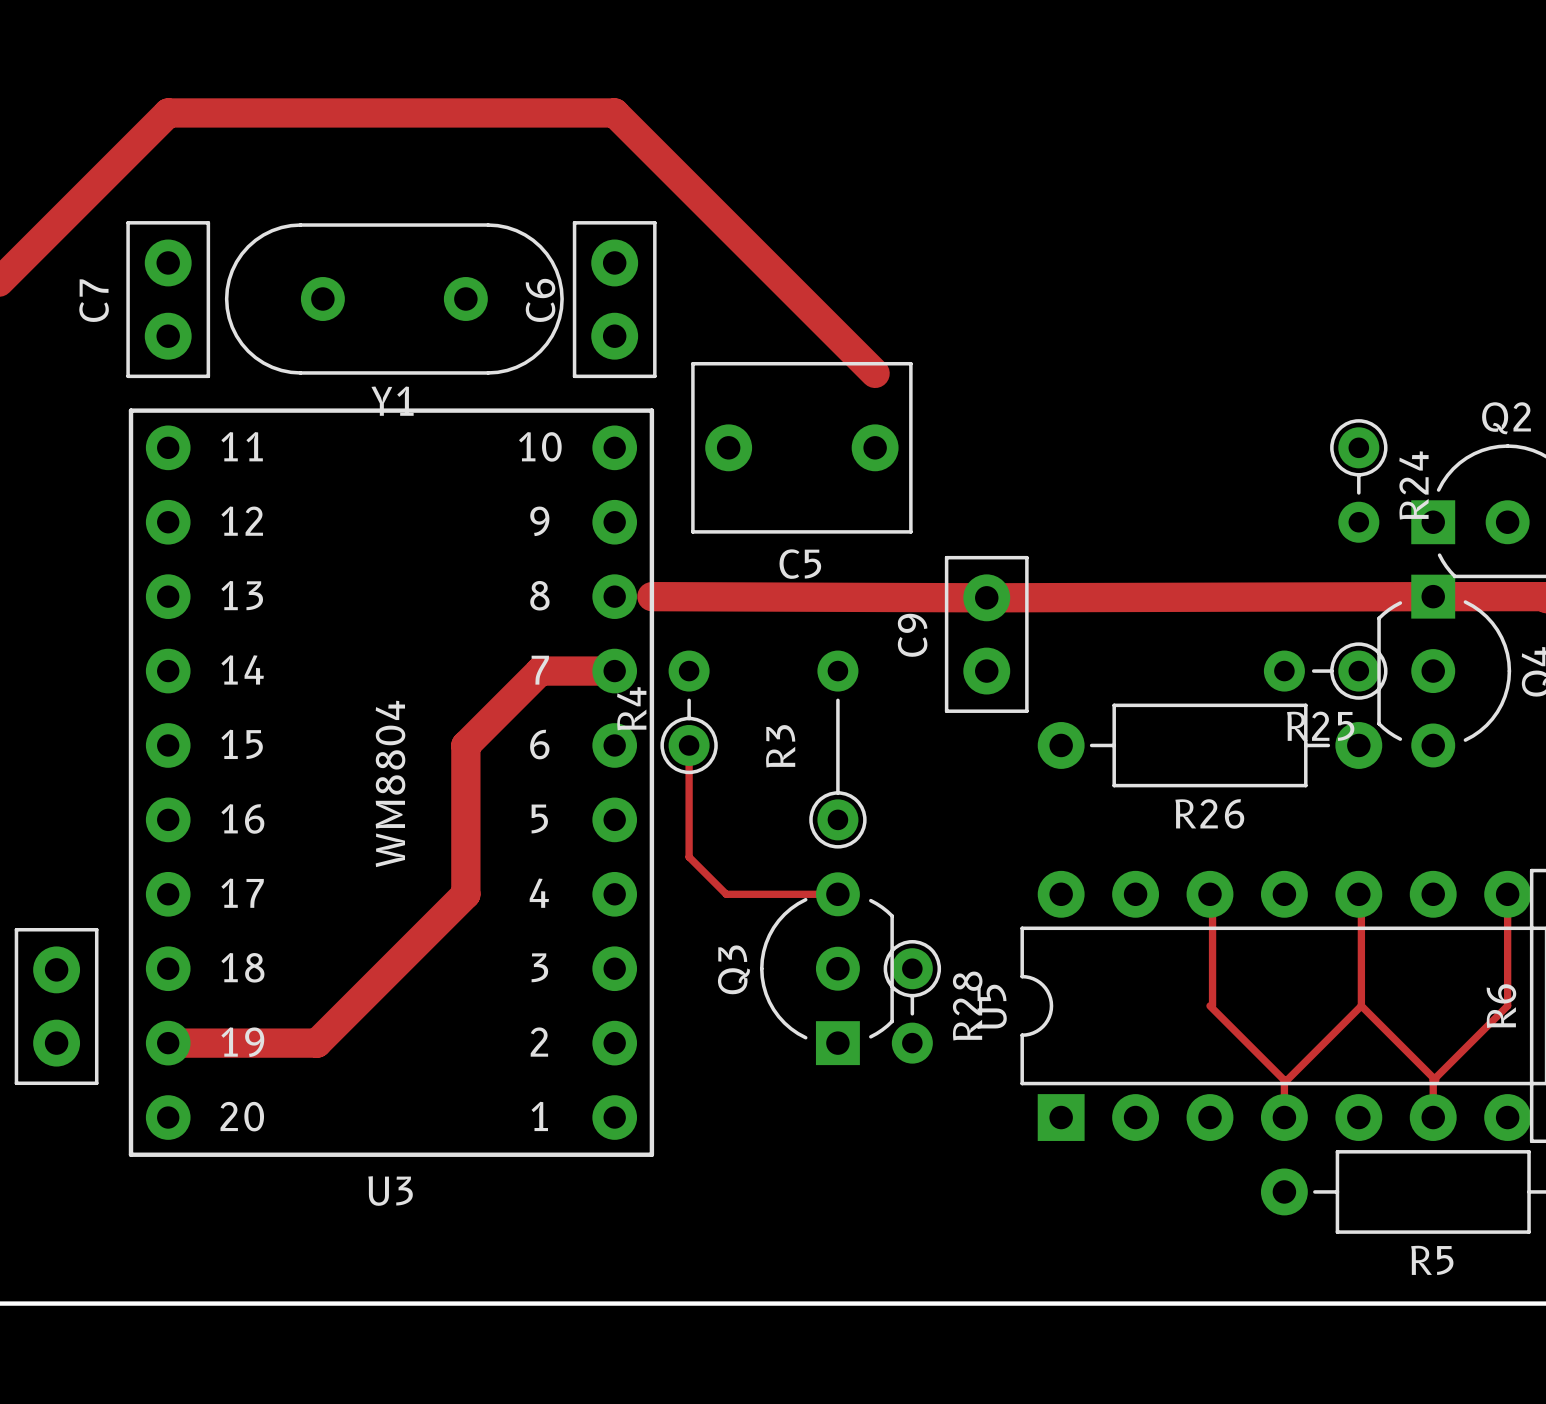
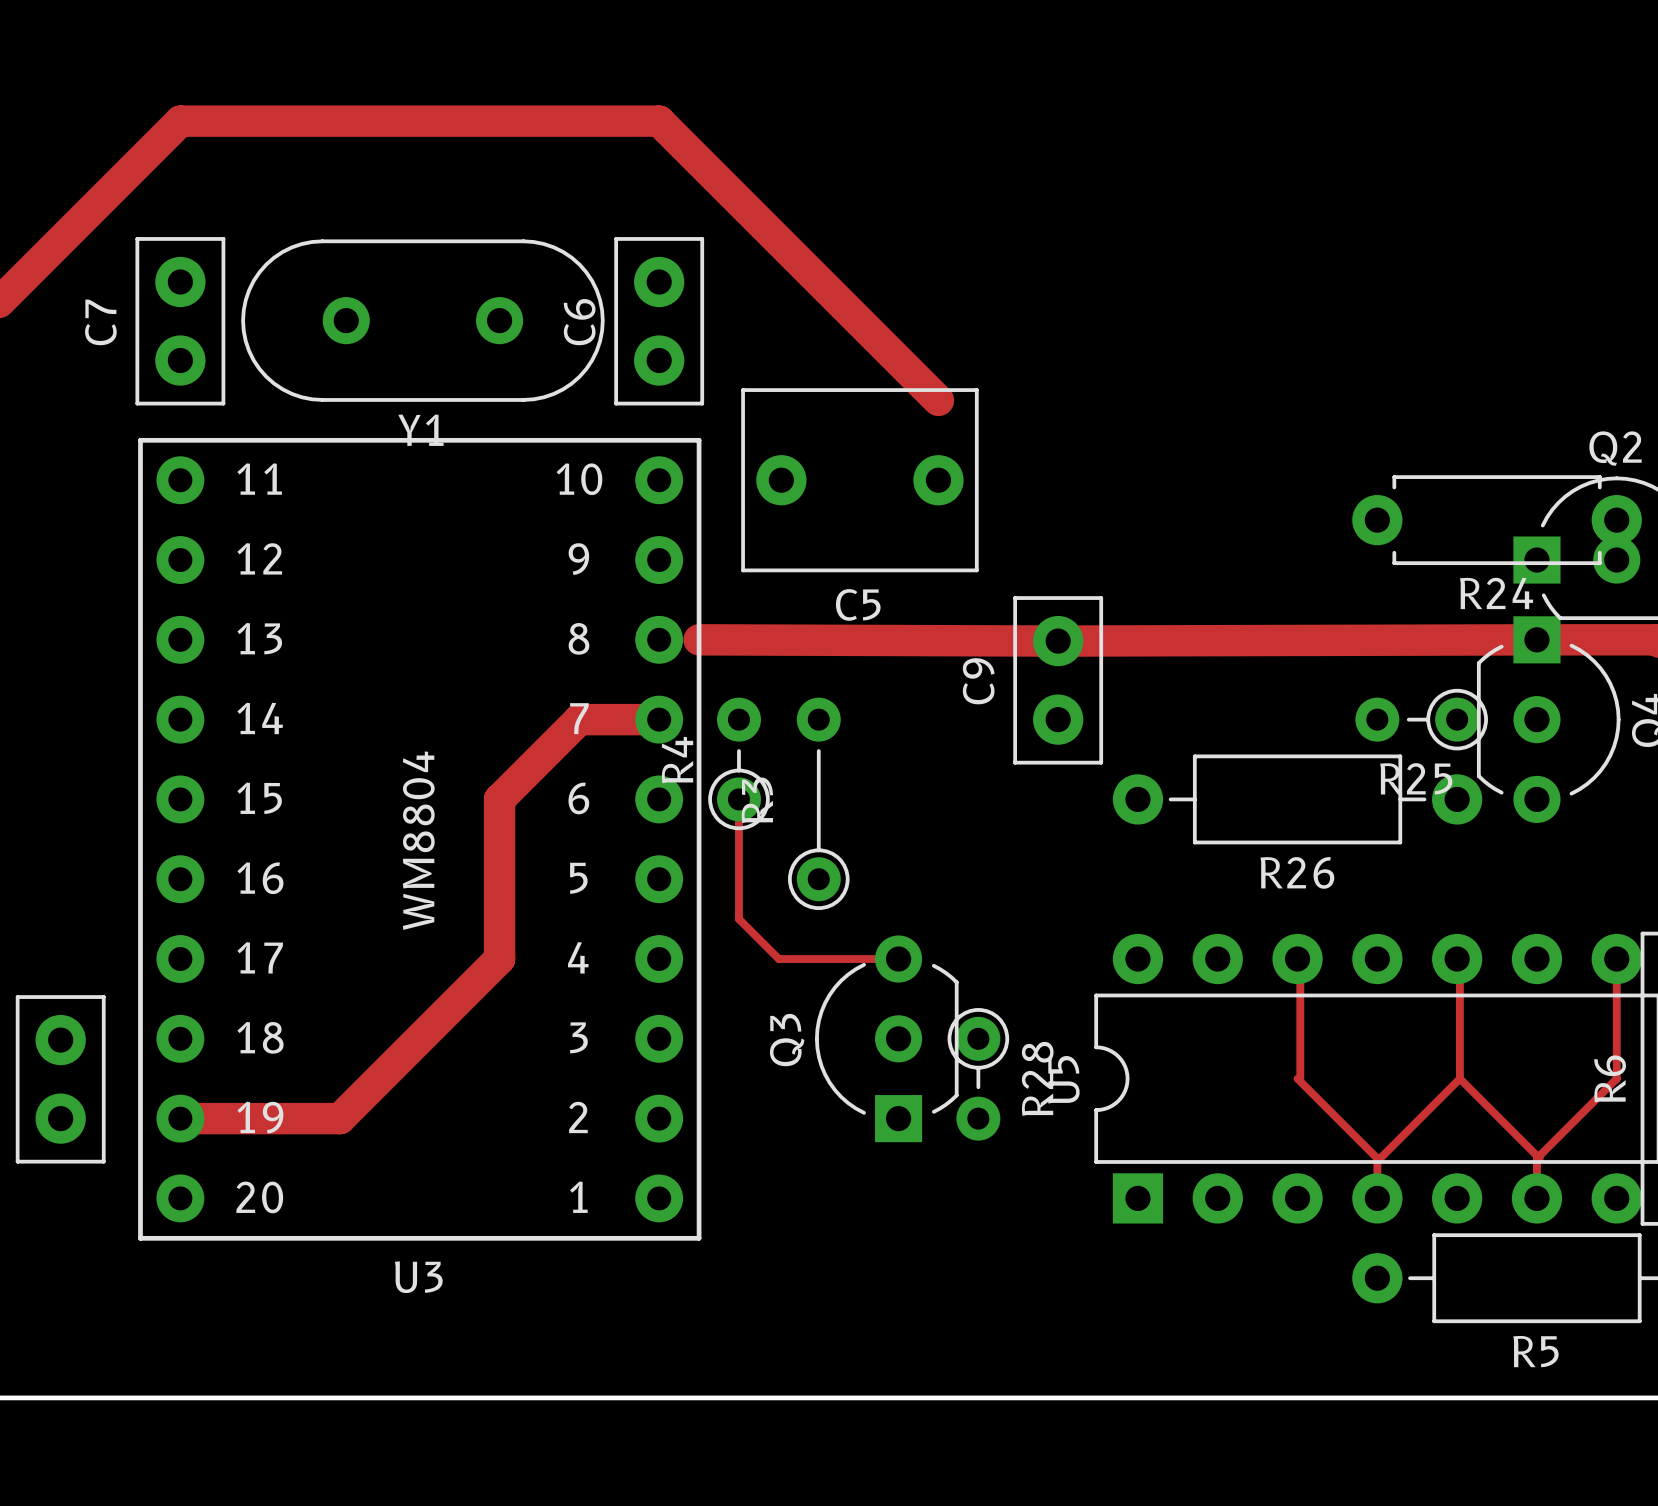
R24 footprint: [1330, 419, 1388, 543] -> [1352, 475, 1642, 566]
R24 name position: R24 (1413, 485) -> R24 (1496, 593)
R3 position: (837, 749) -> (818, 803)

